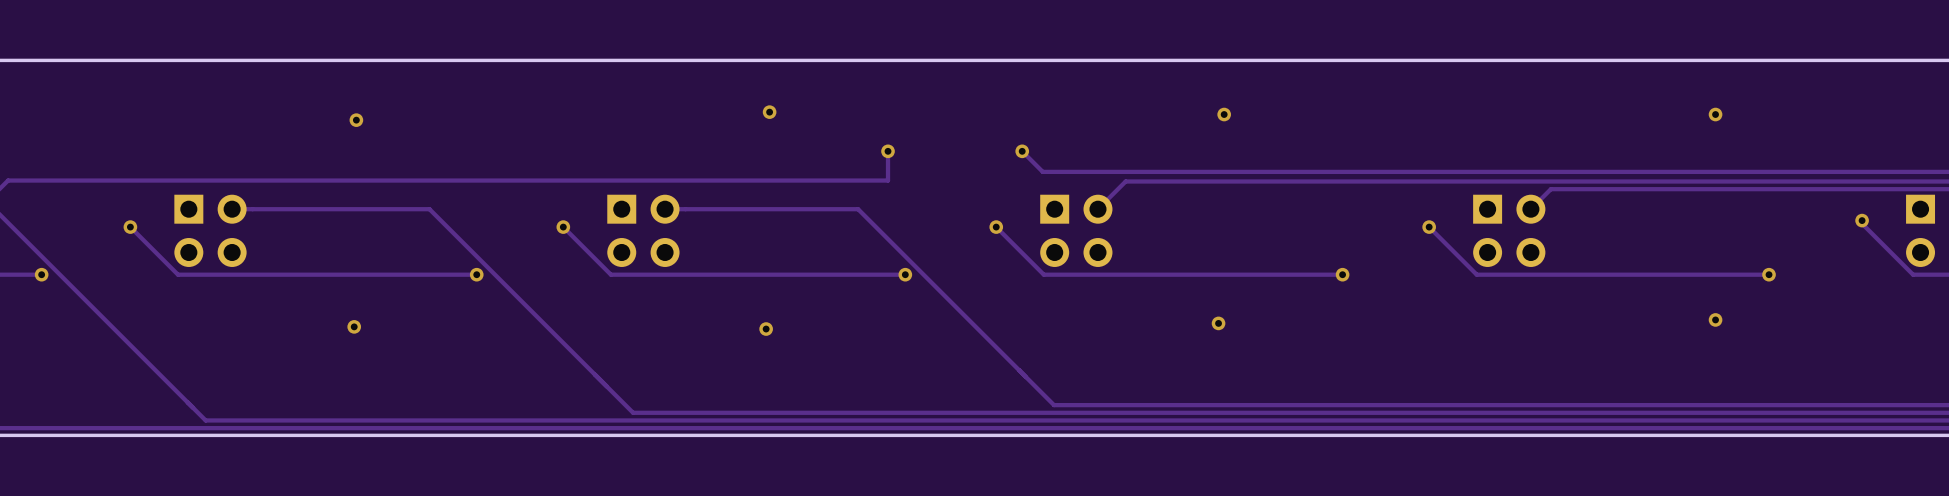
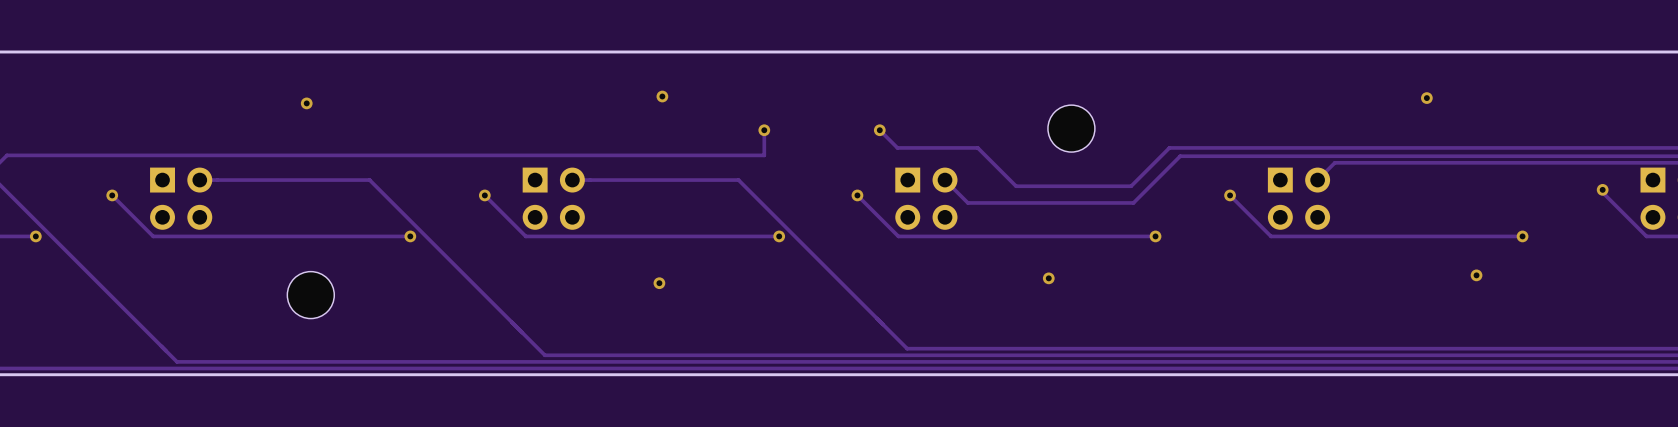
via: (1224, 114) -> none
via position: (1715, 114) -> (1426, 98)
part: none -> (1071, 128)
track: (1358, 171) (1136, 171) -> (1169, 147) (1131, 186) (1016, 186) (977, 147)
track: (1371, 181) (1125, 181) (1097, 209) -> (1180, 156) (1133, 202) (967, 202) (945, 180)
via: (354, 326) -> none
part: none -> (310, 295)

